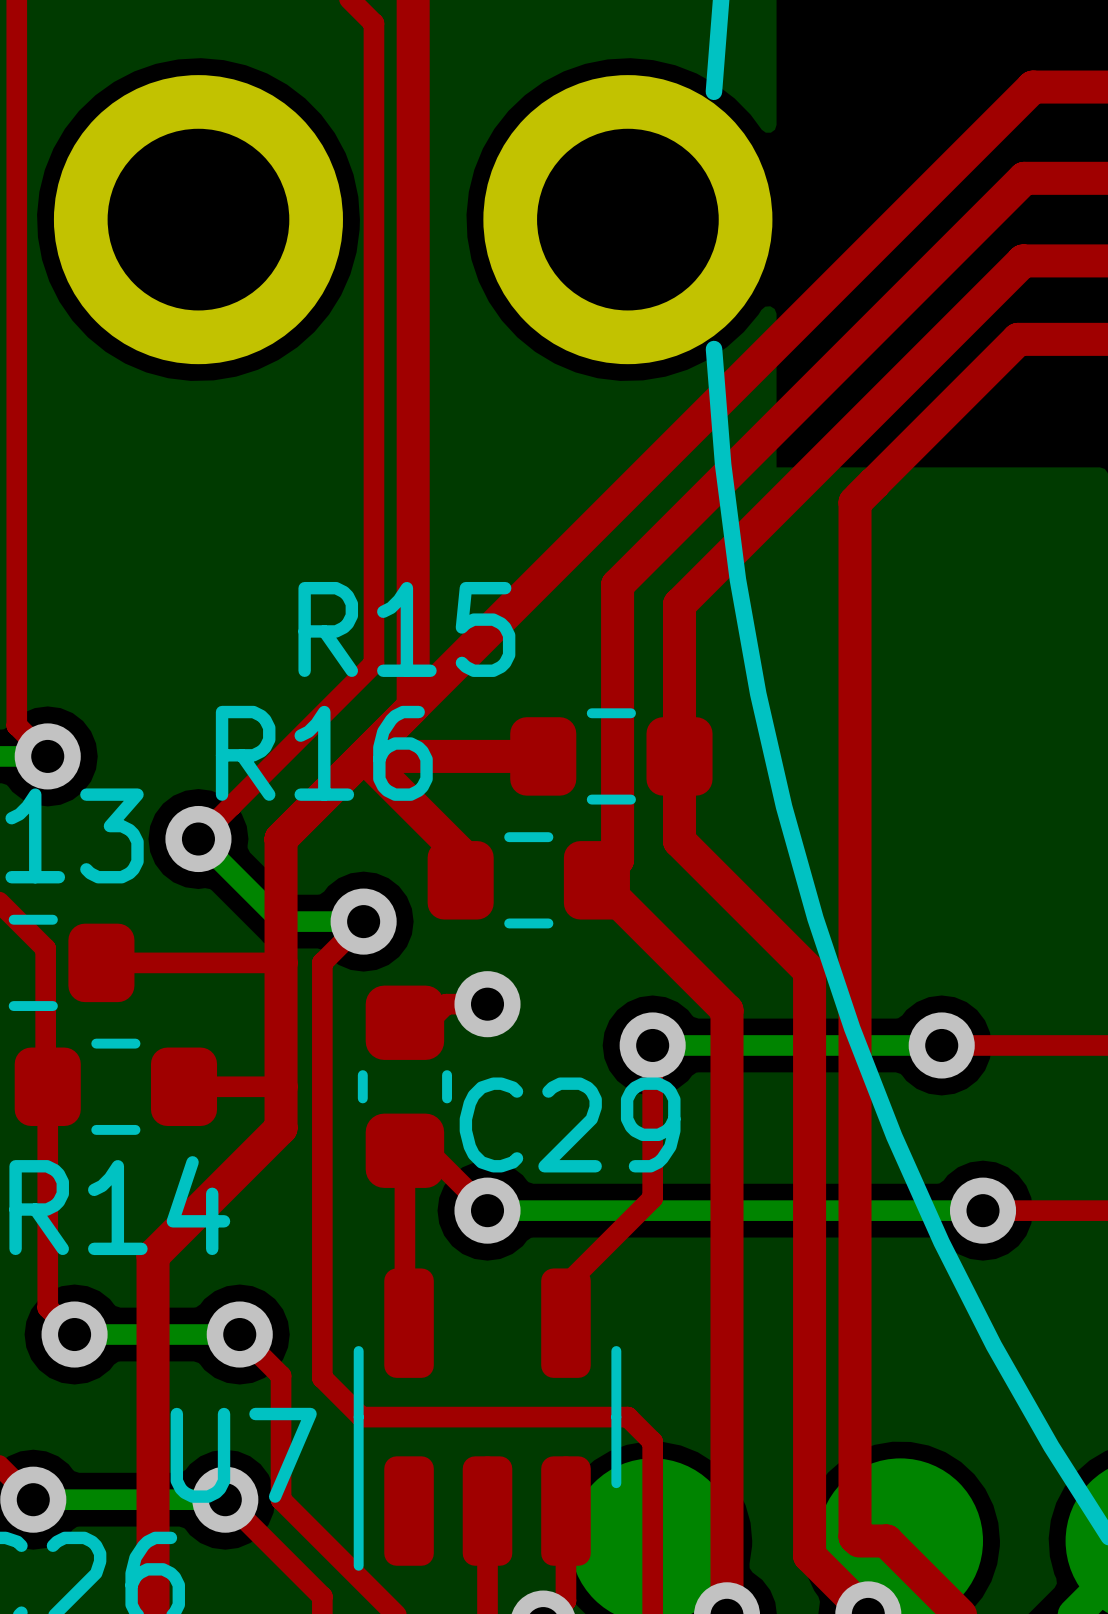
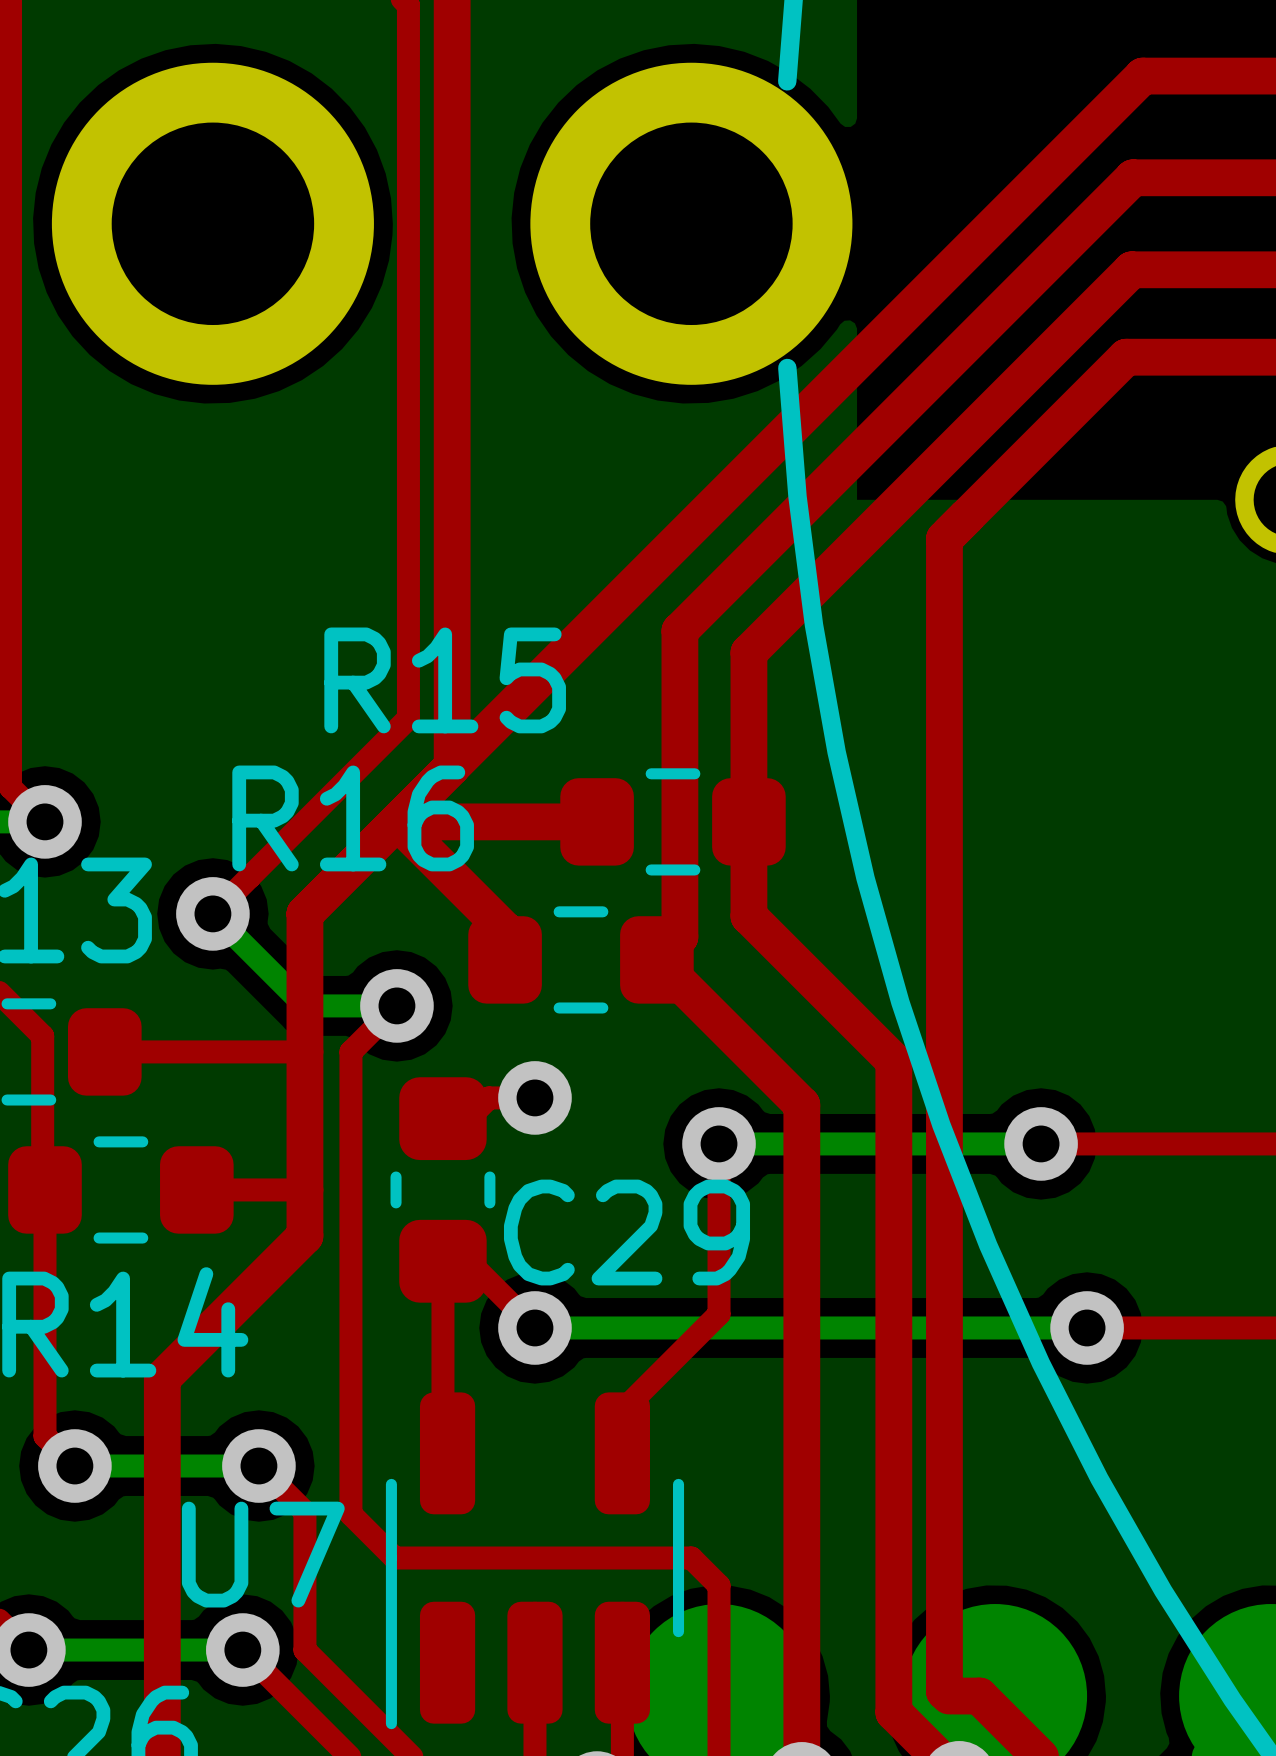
U7 name position: U7 (243, 1455) -> U7 (263, 1554)

